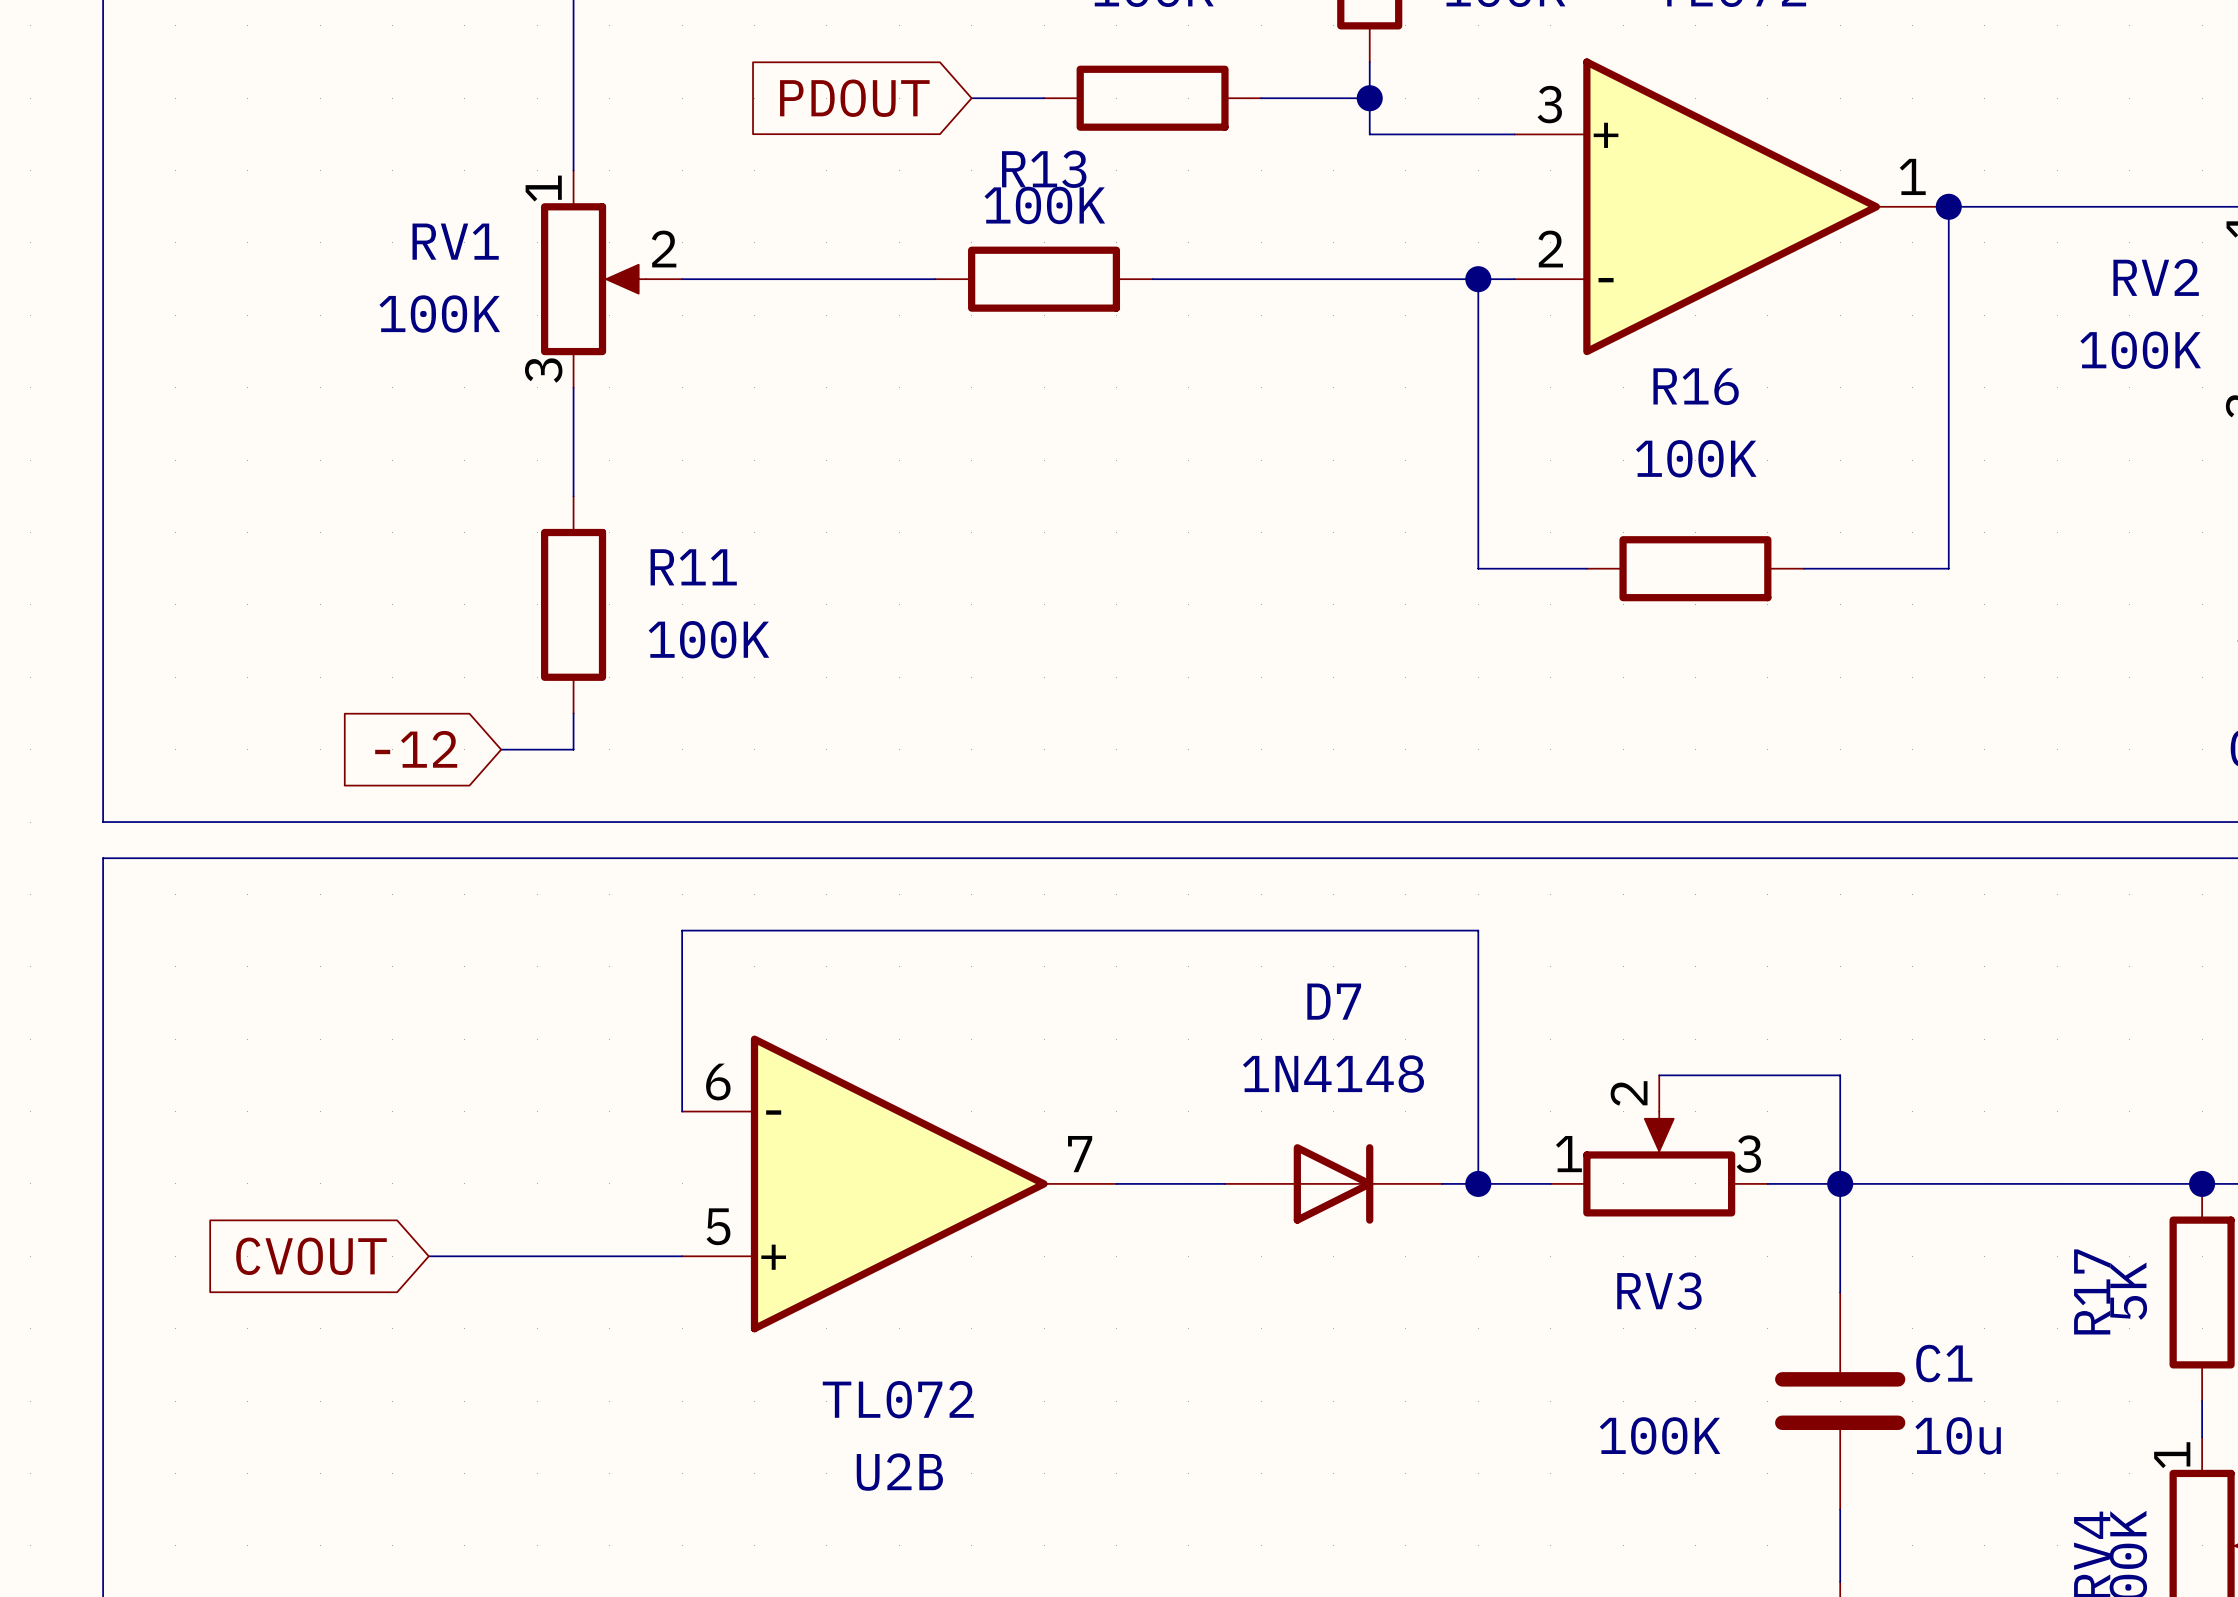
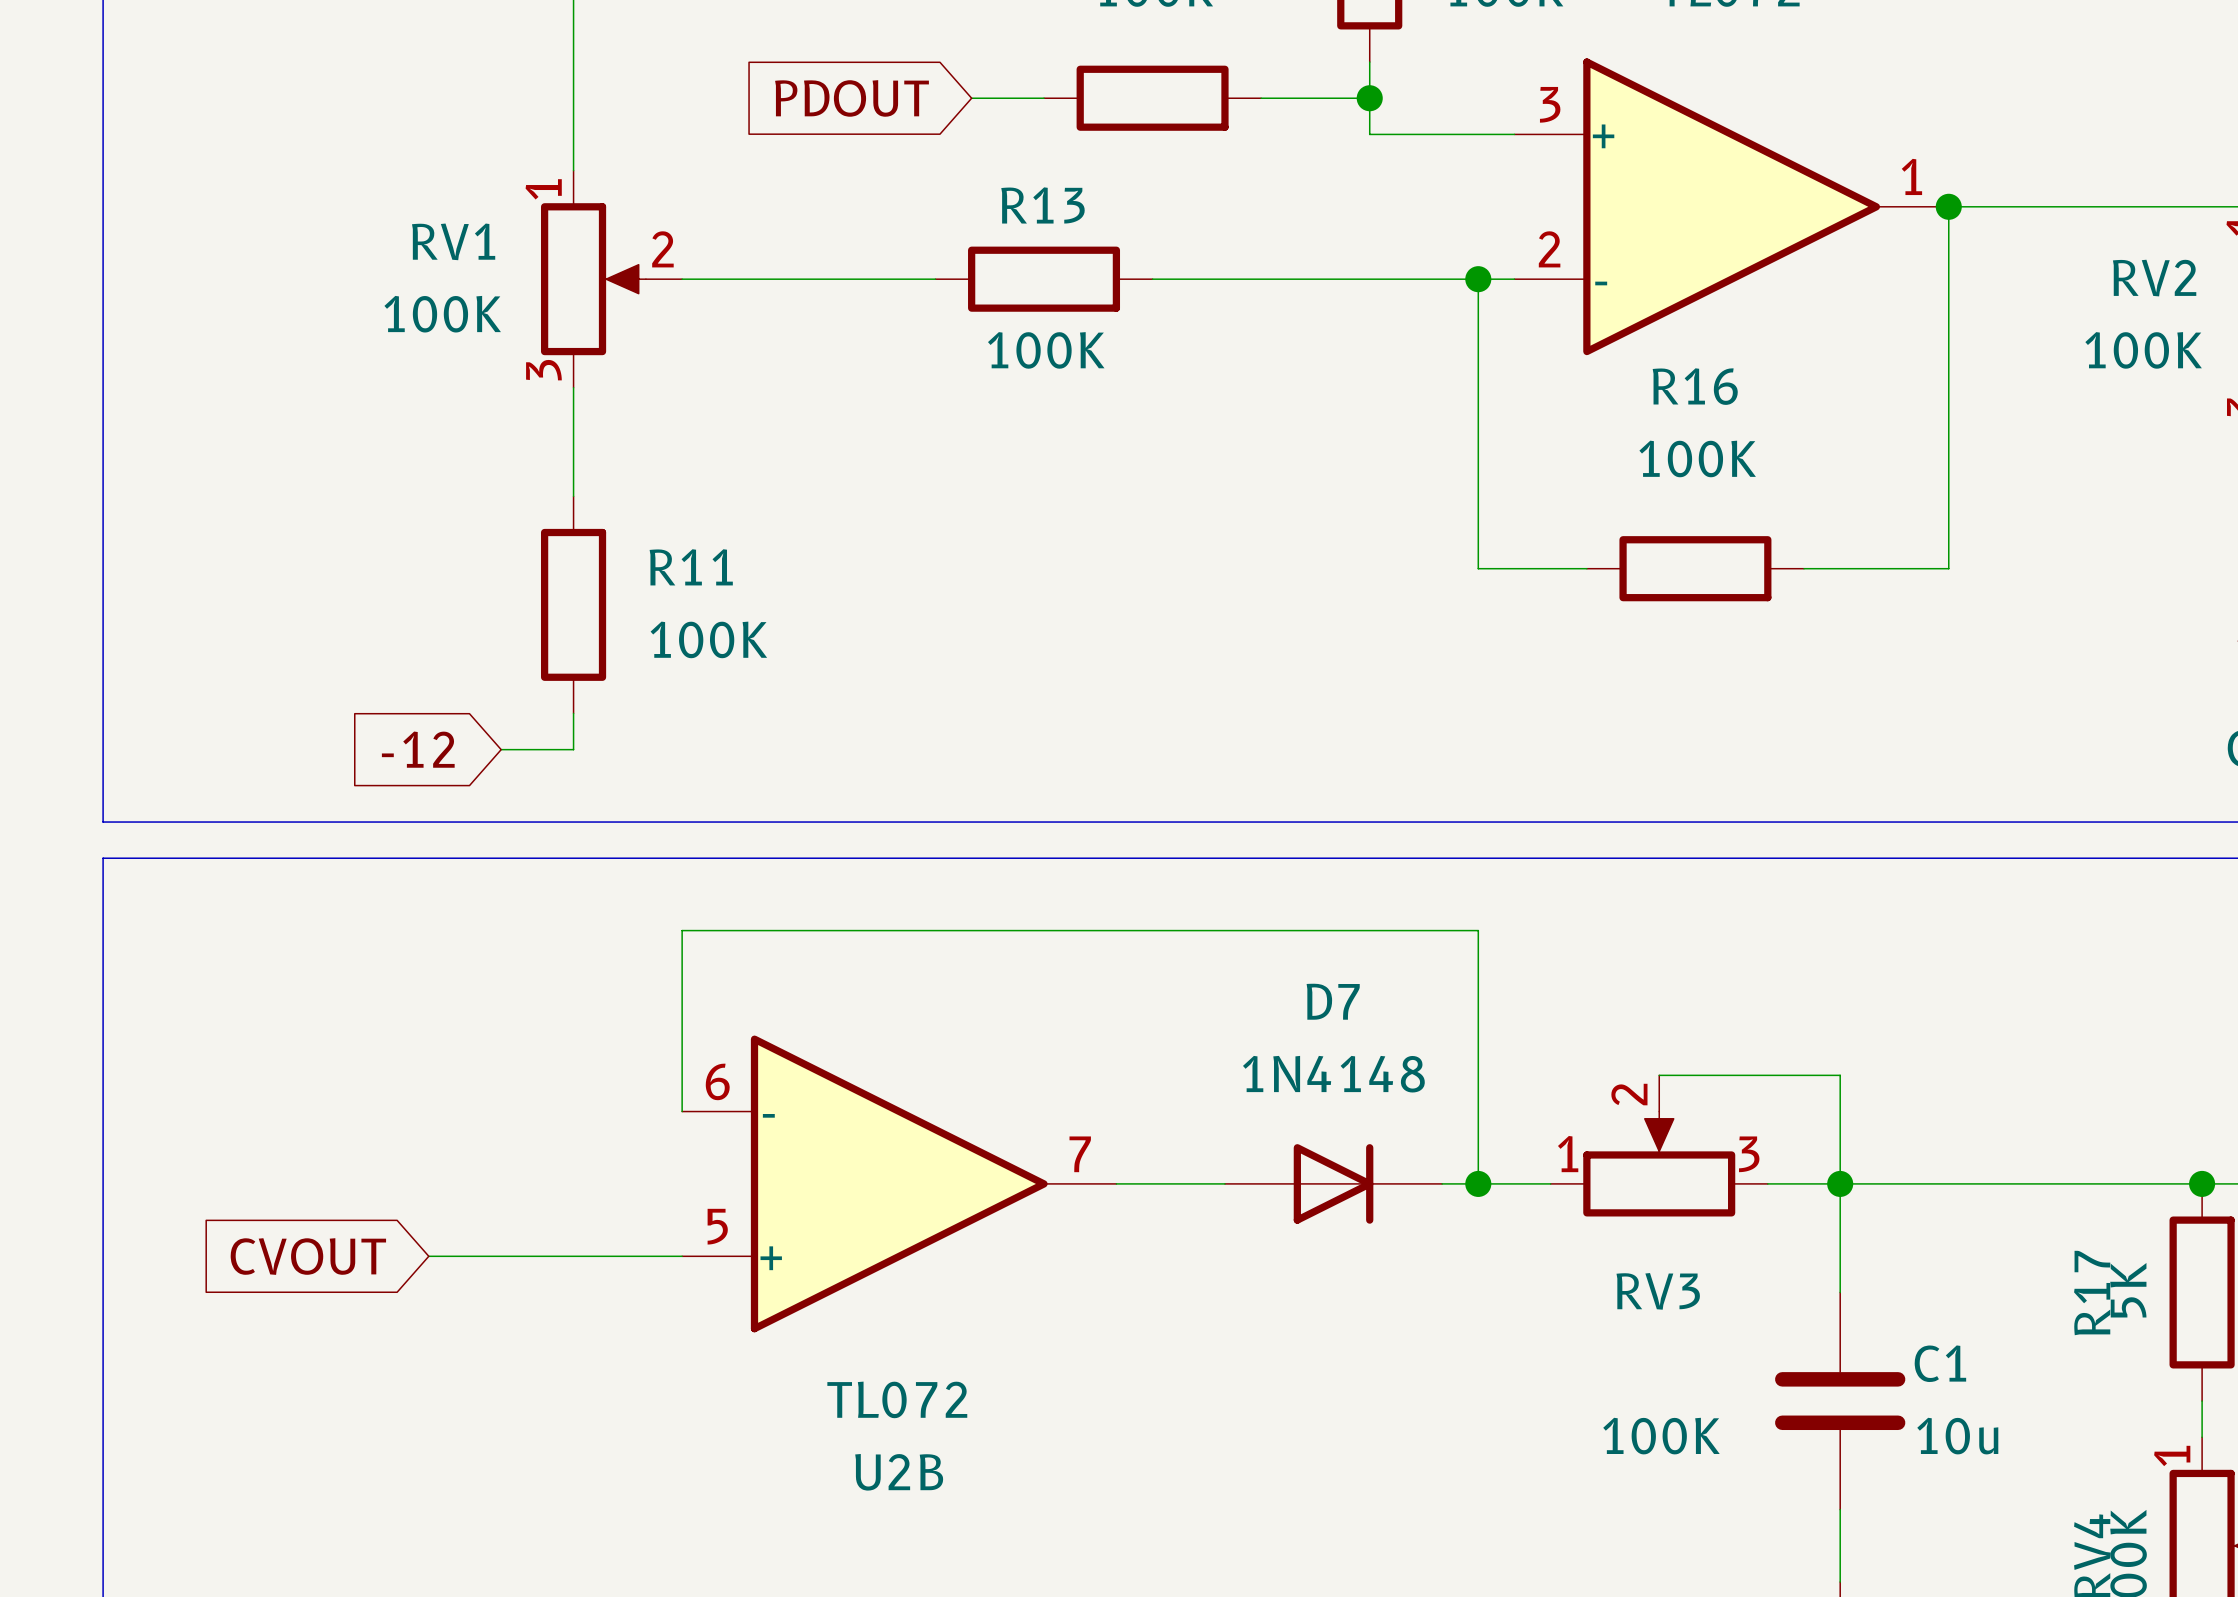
R13 name position: R13 (1044, 169) -> R13 (1042, 205)
R13 value position: 100K (1044, 205) -> 100K (1046, 350)

